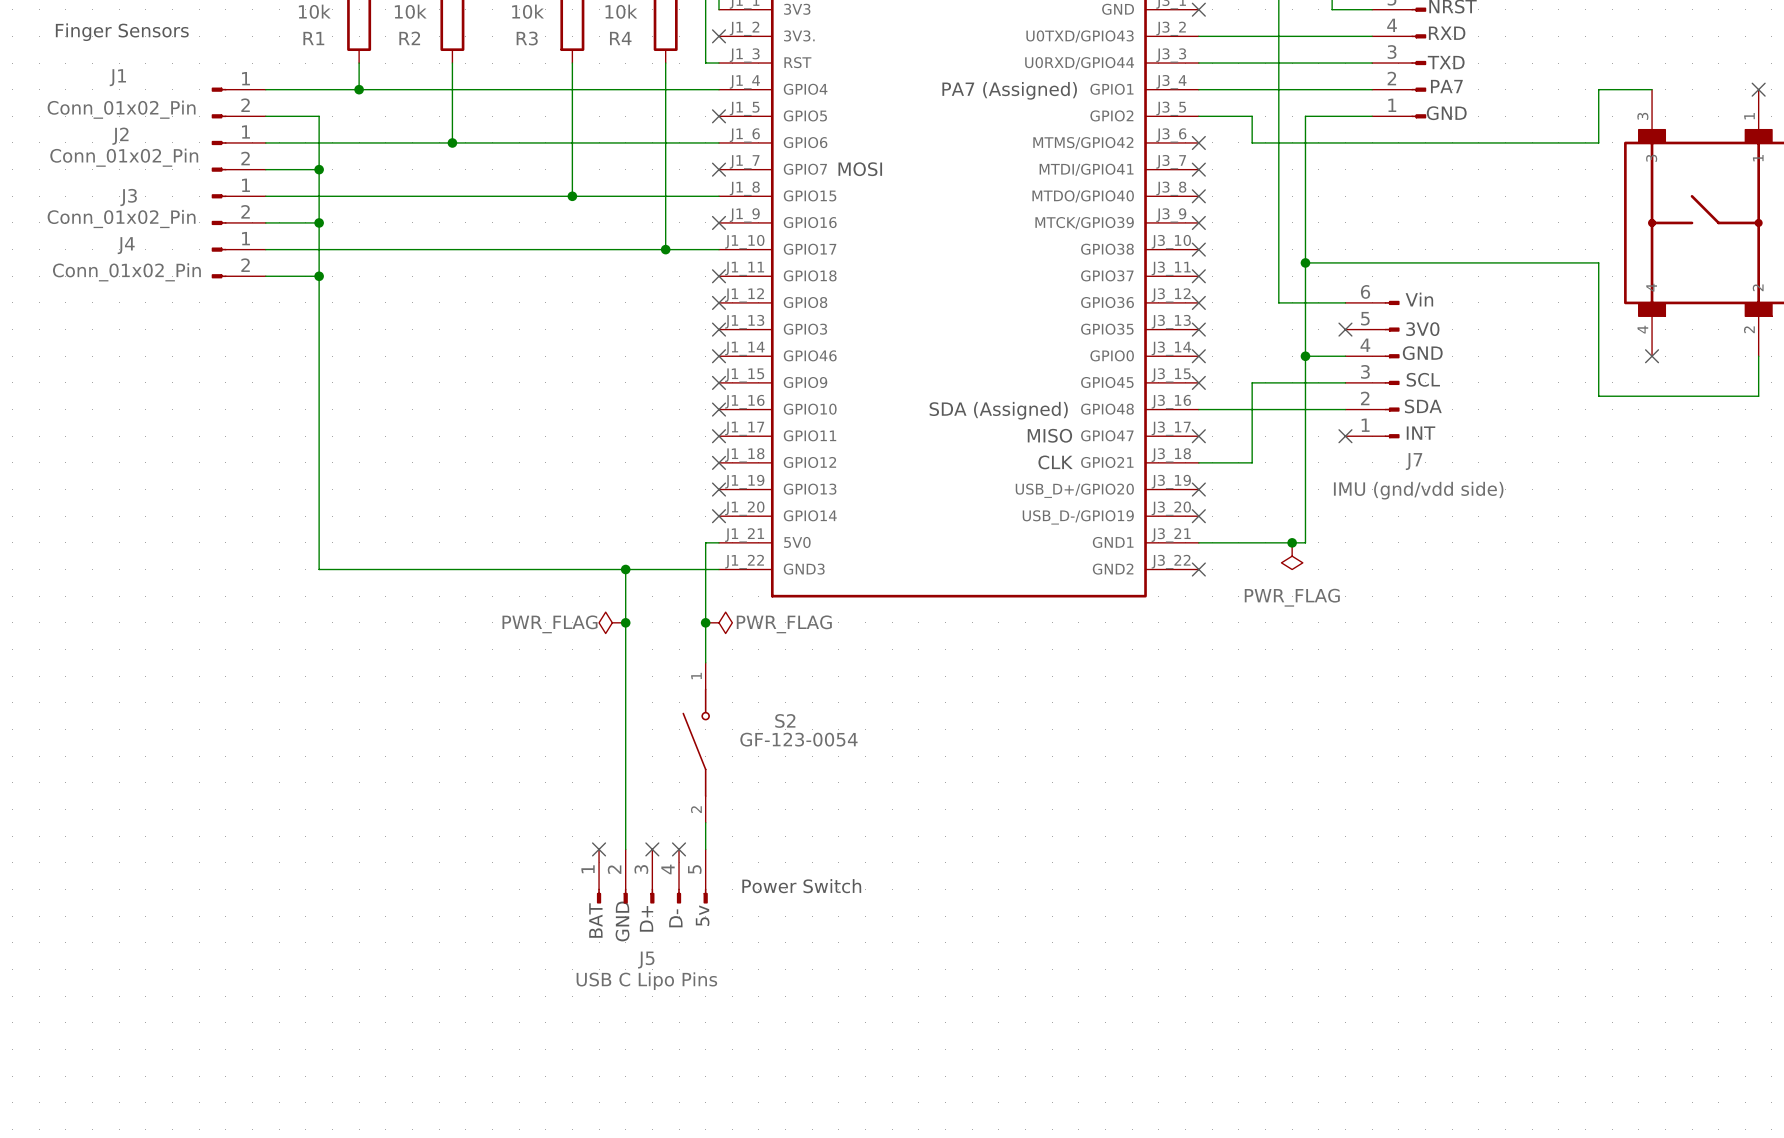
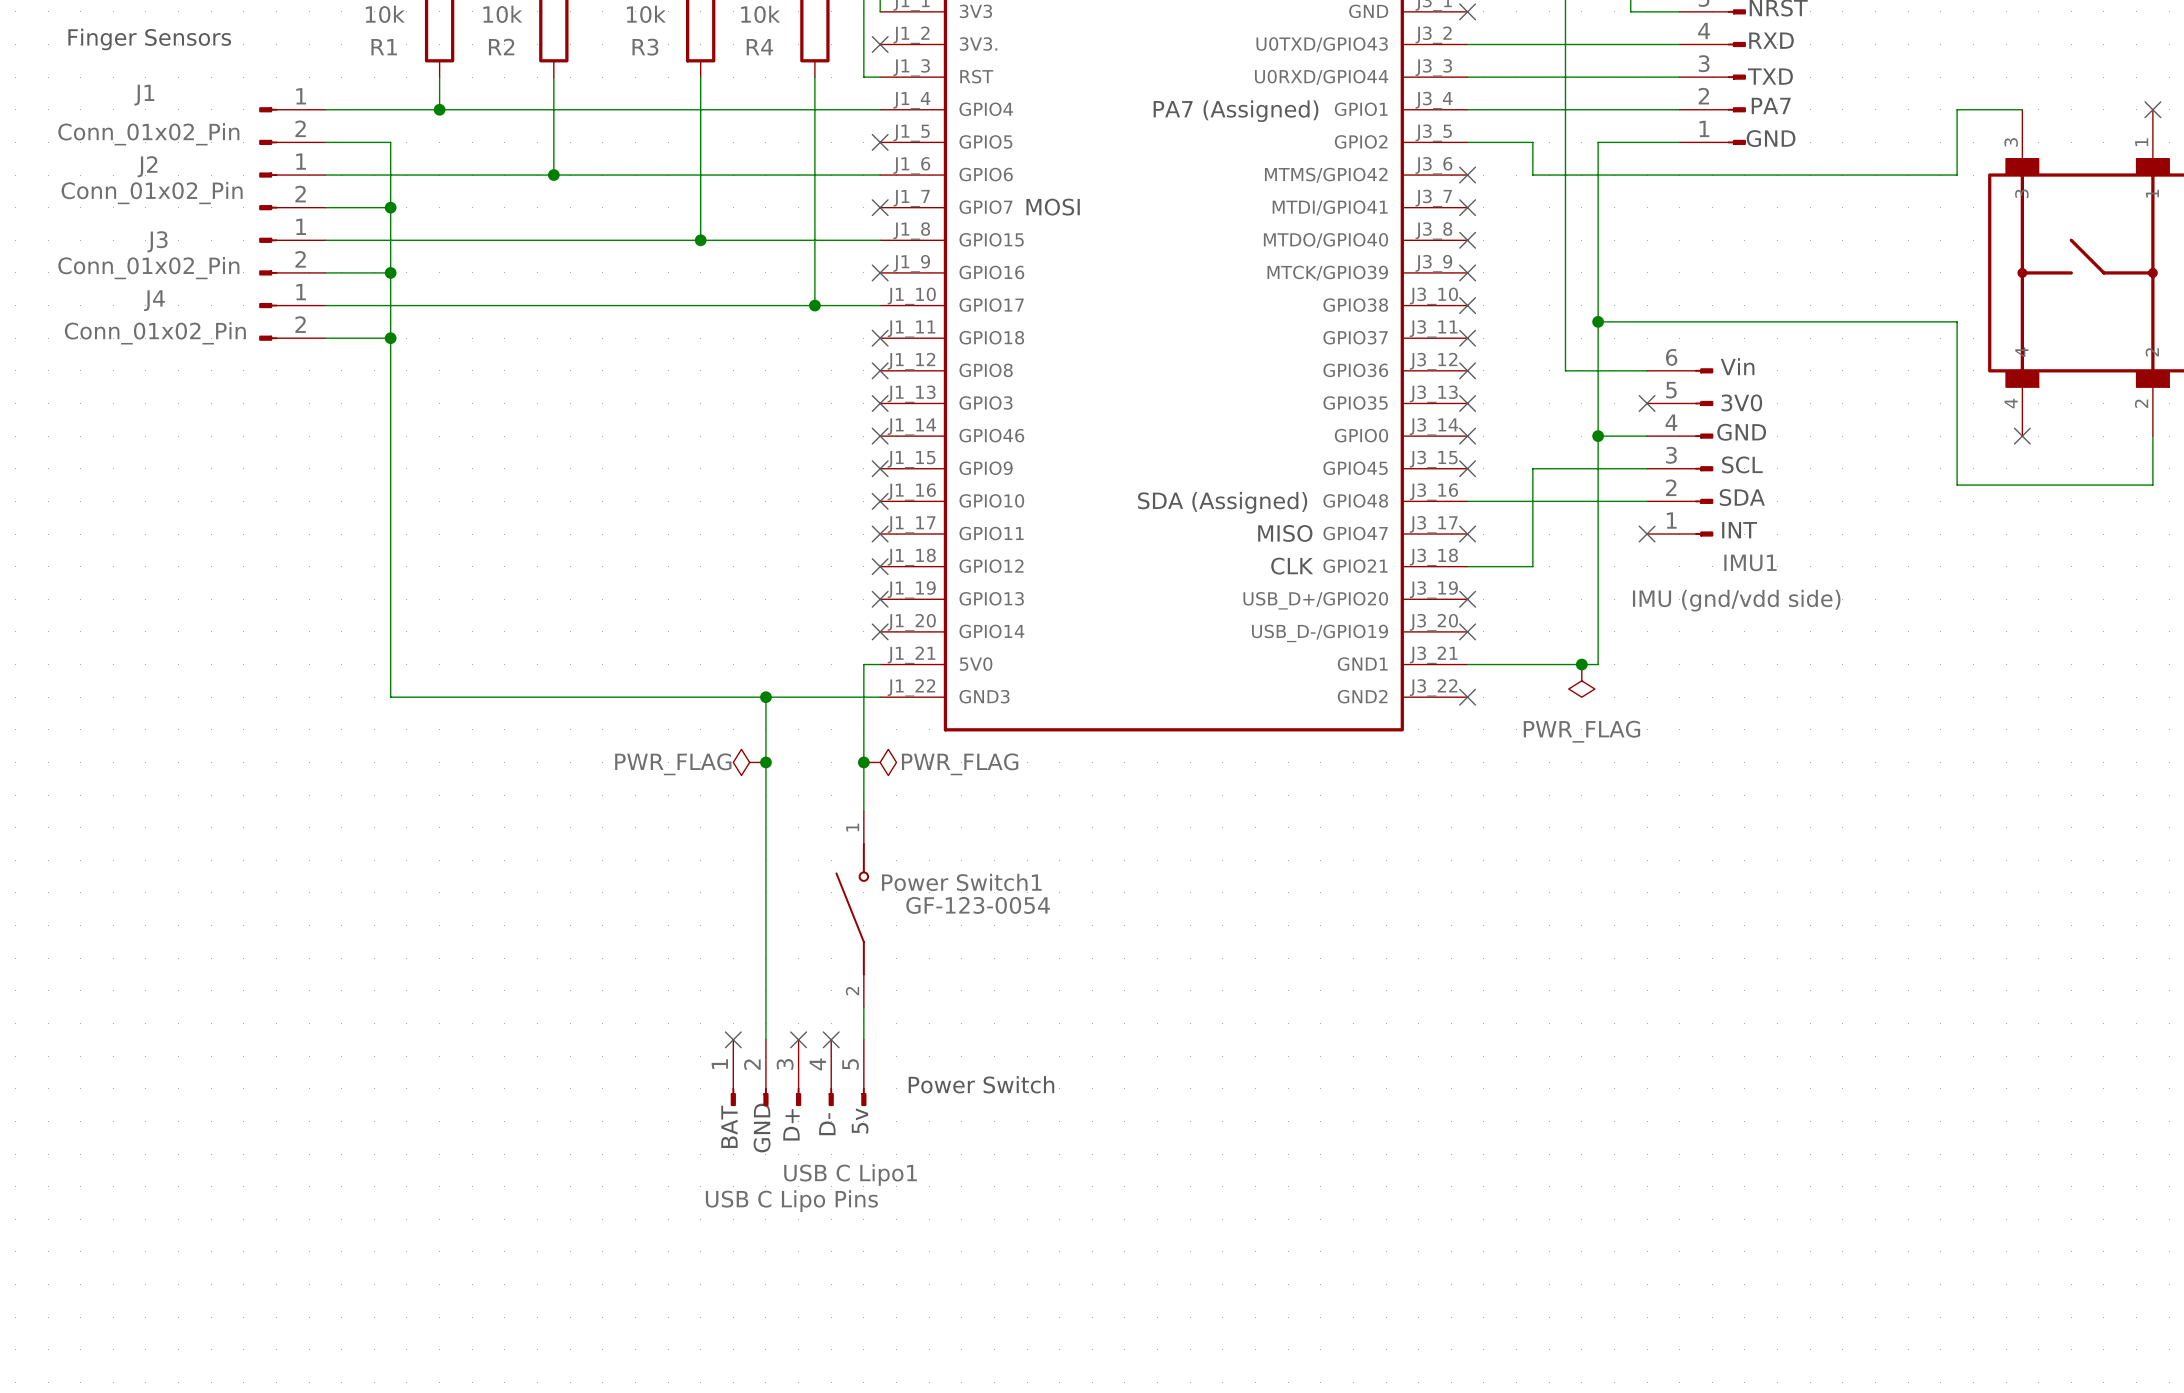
J7 name: J7 (1414, 461) -> IMU1 (1750, 562)
S2 name: S2 (785, 720) -> Power Switch1 (961, 882)
J5 name: J5 (646, 960) -> USB C Lipo1 (850, 1175)

